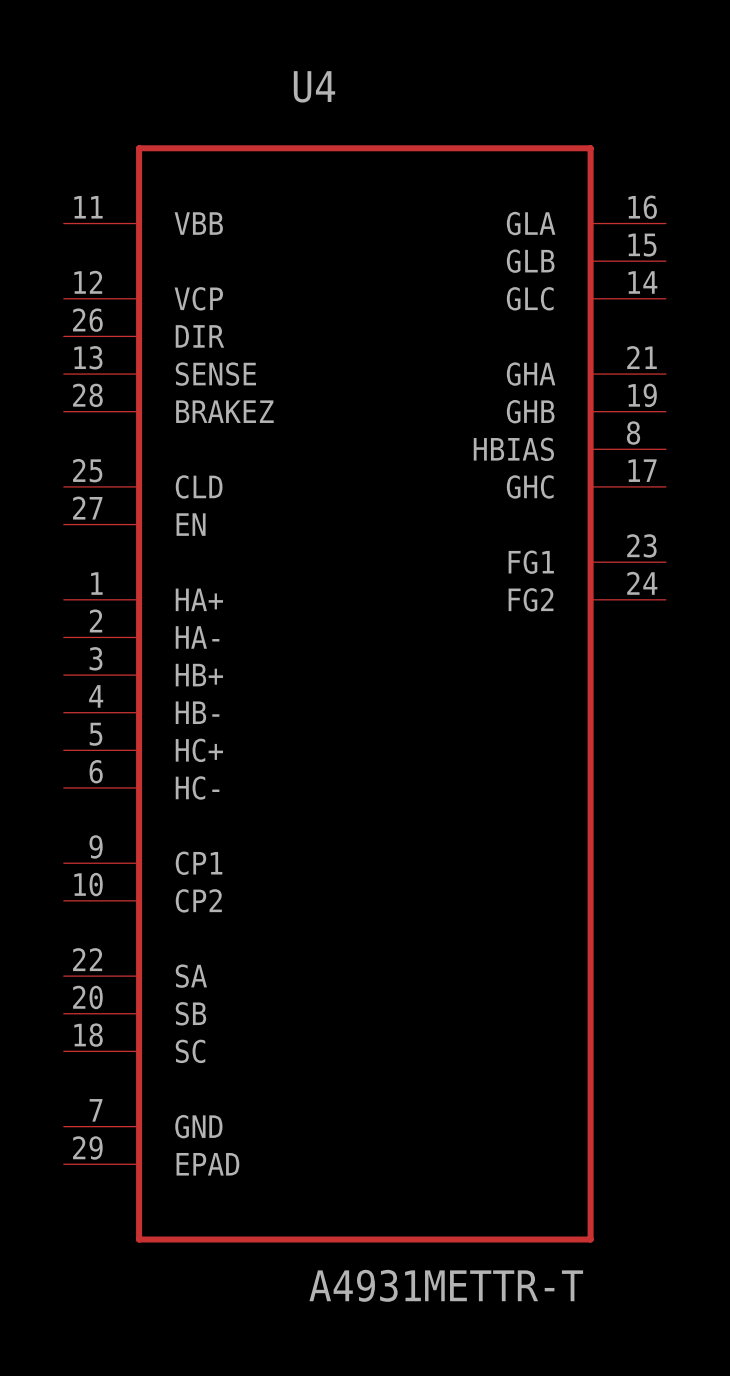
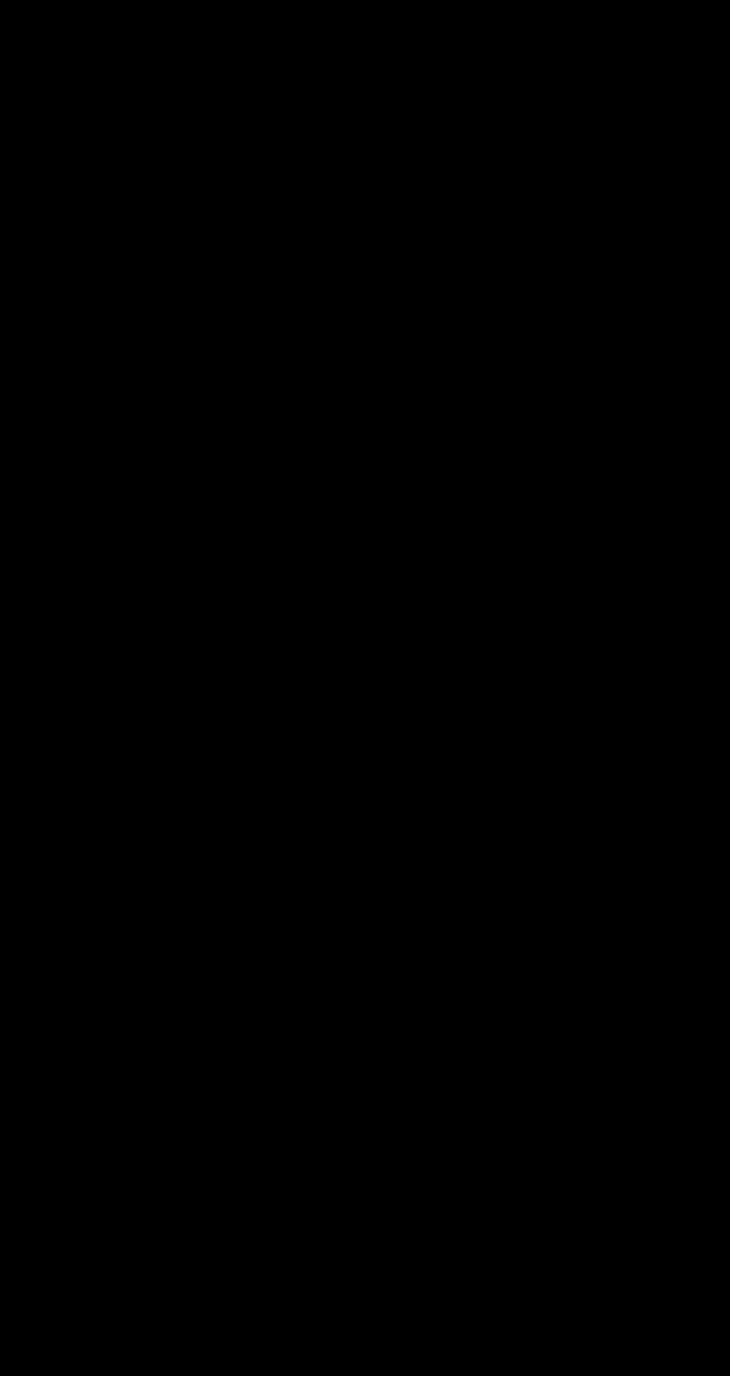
U4: A4931METTR-T (364, 693) -> none

